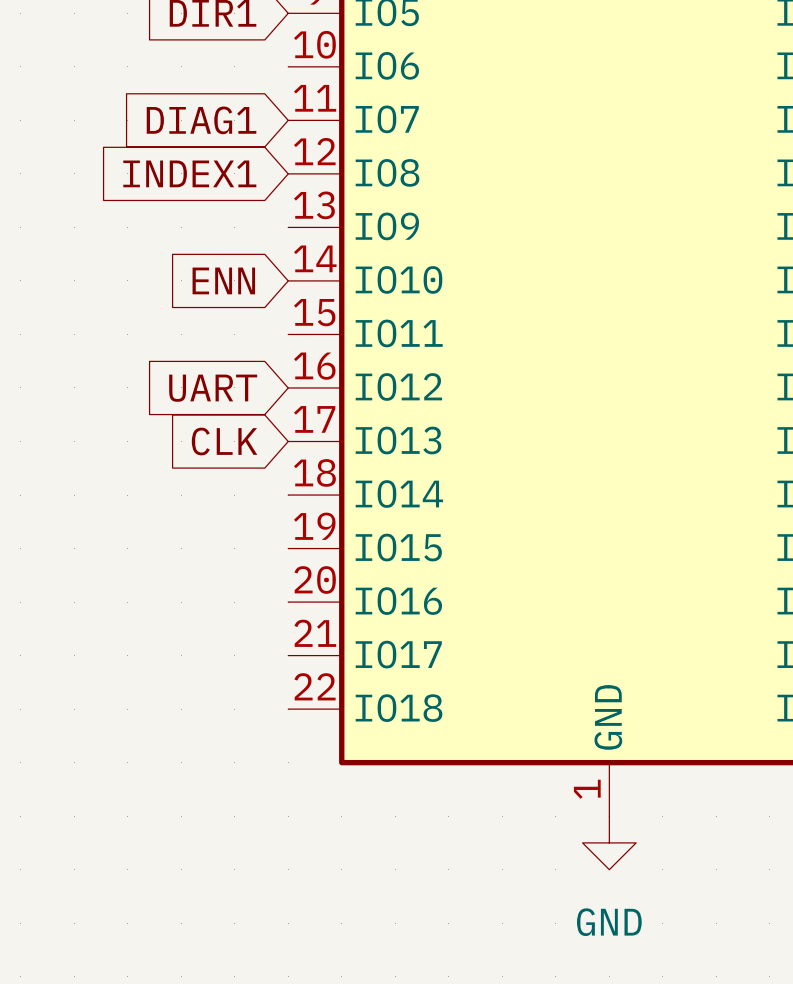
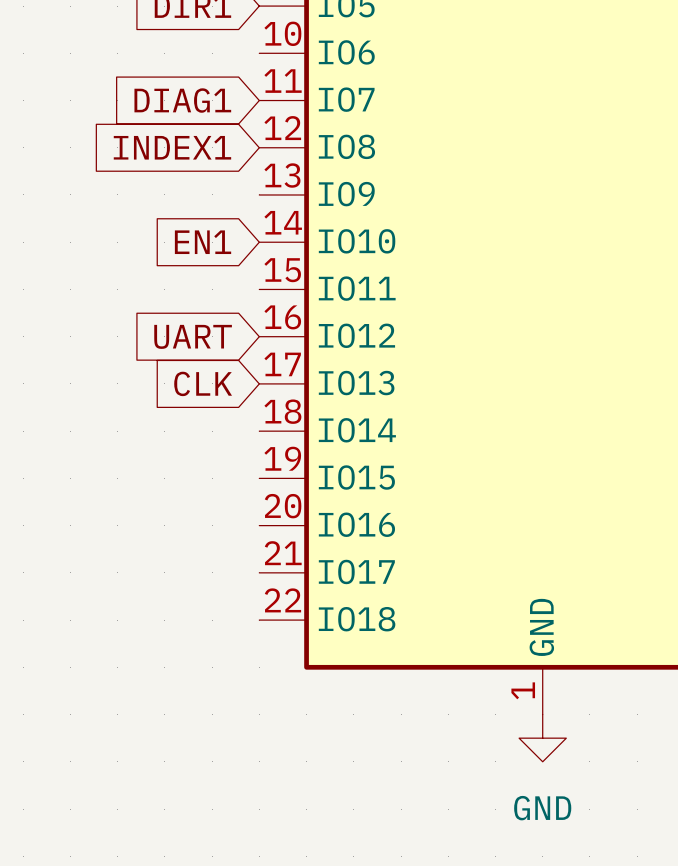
global label: ENN (223, 280) -> EN1 (203, 242)

